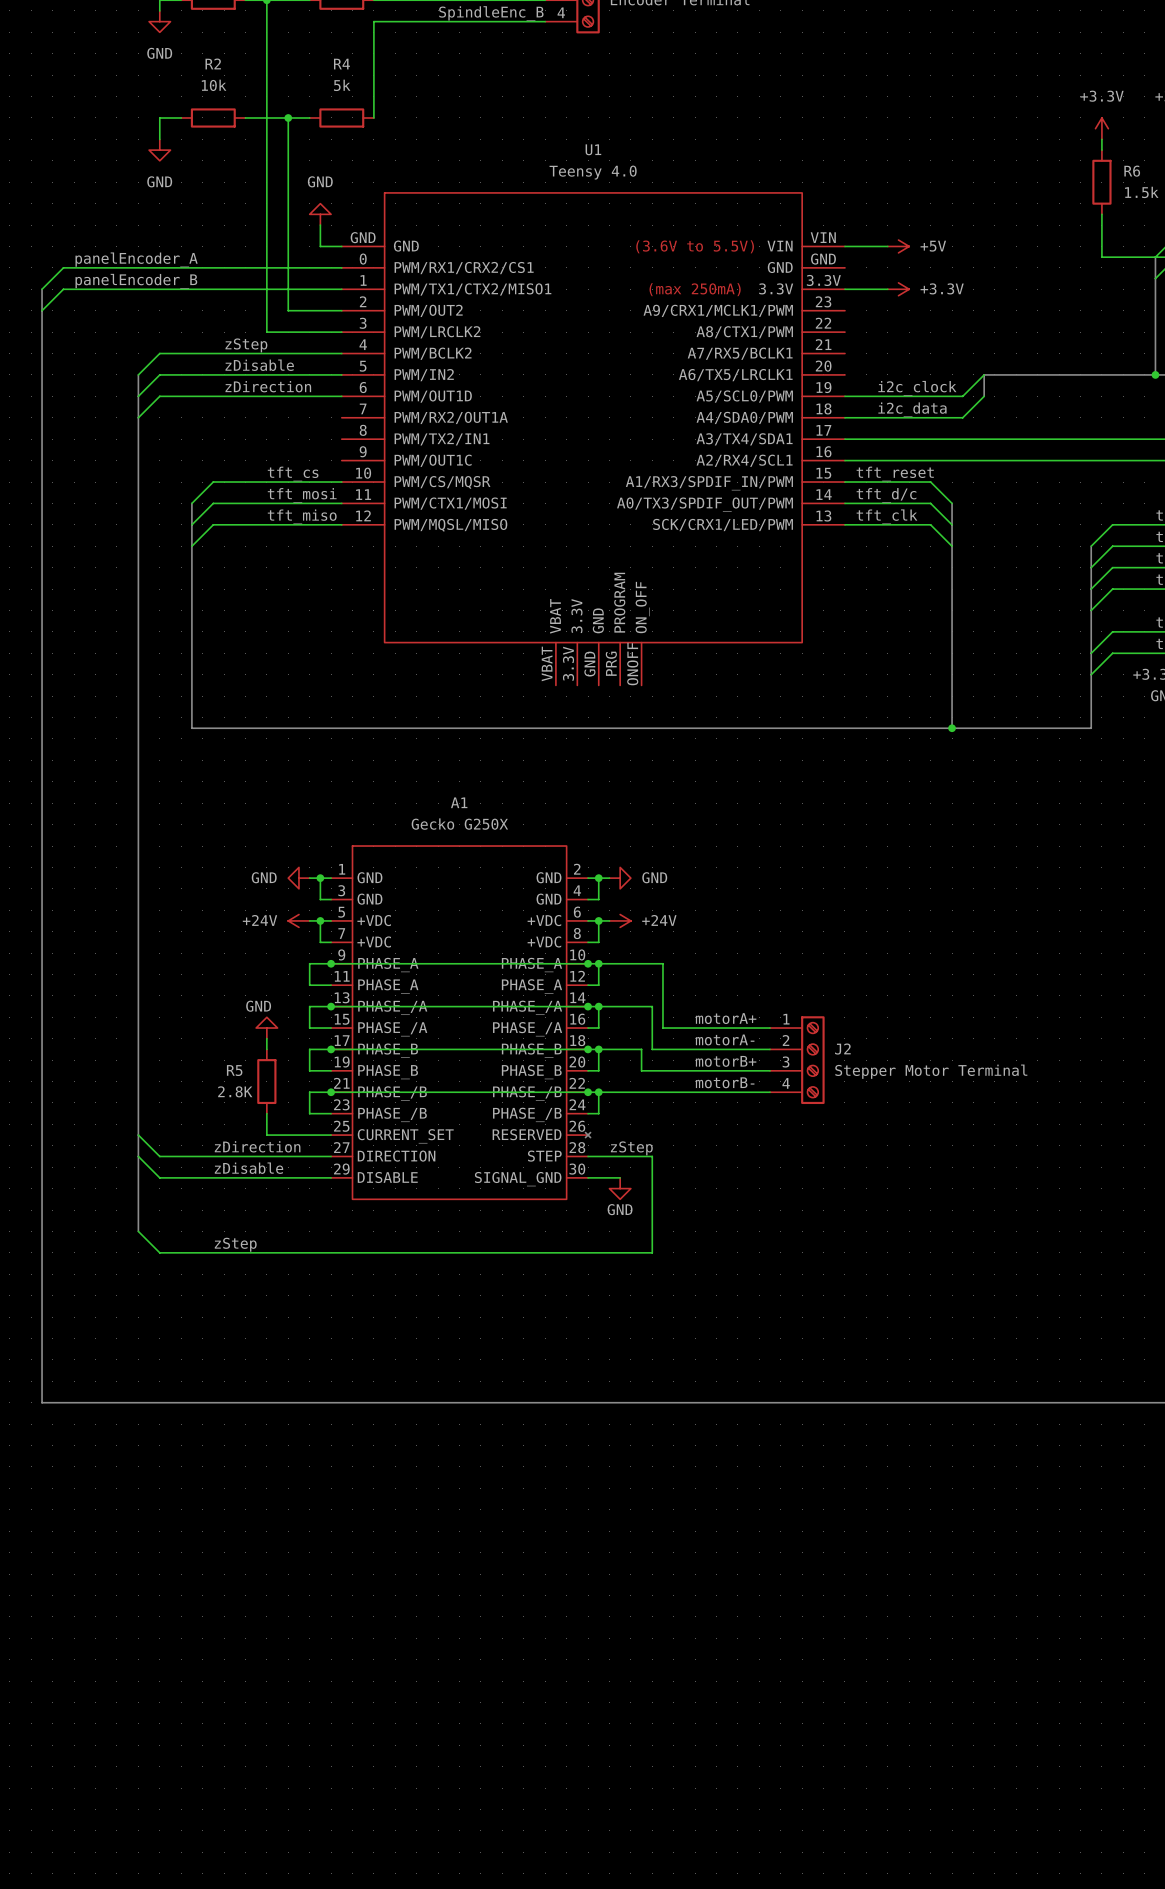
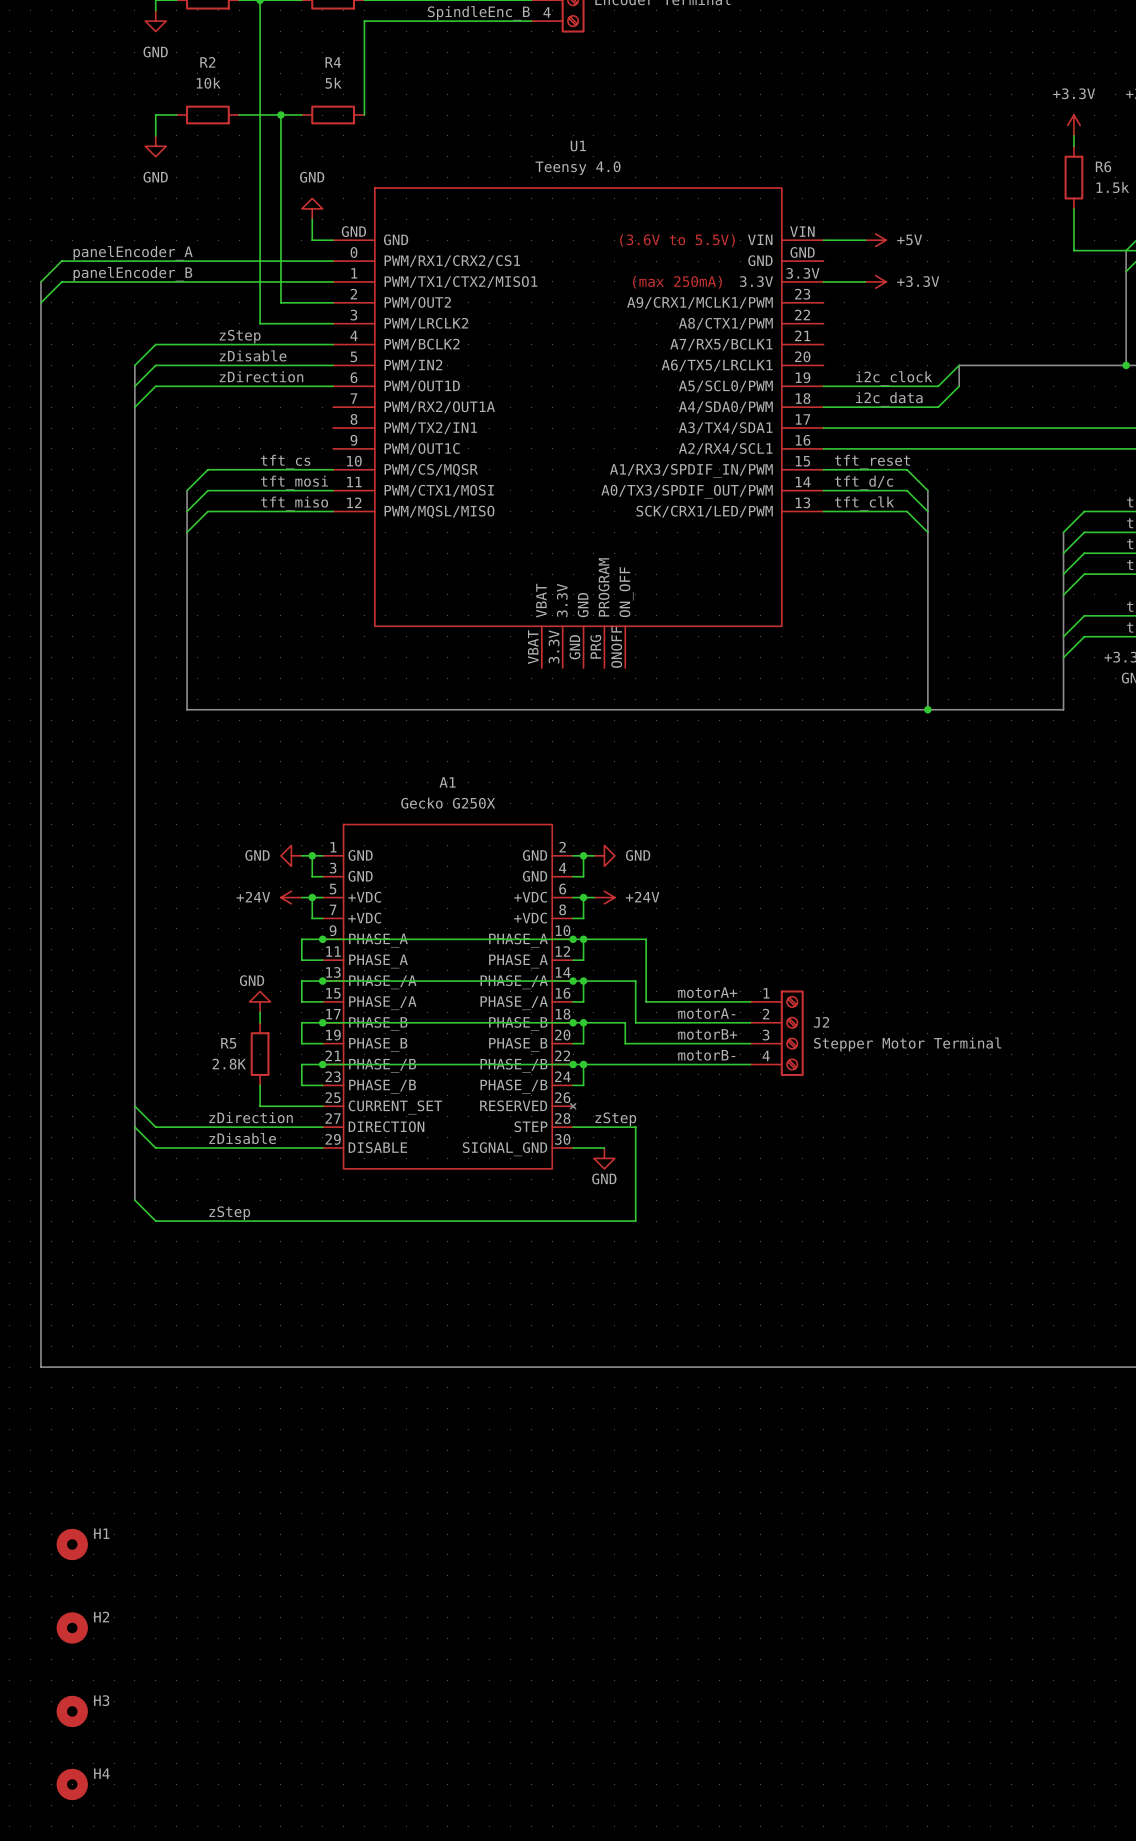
H1: none -> (72, 1544)
H2: none -> (72, 1627)
H3: none -> (72, 1711)
H4: none -> (72, 1784)

